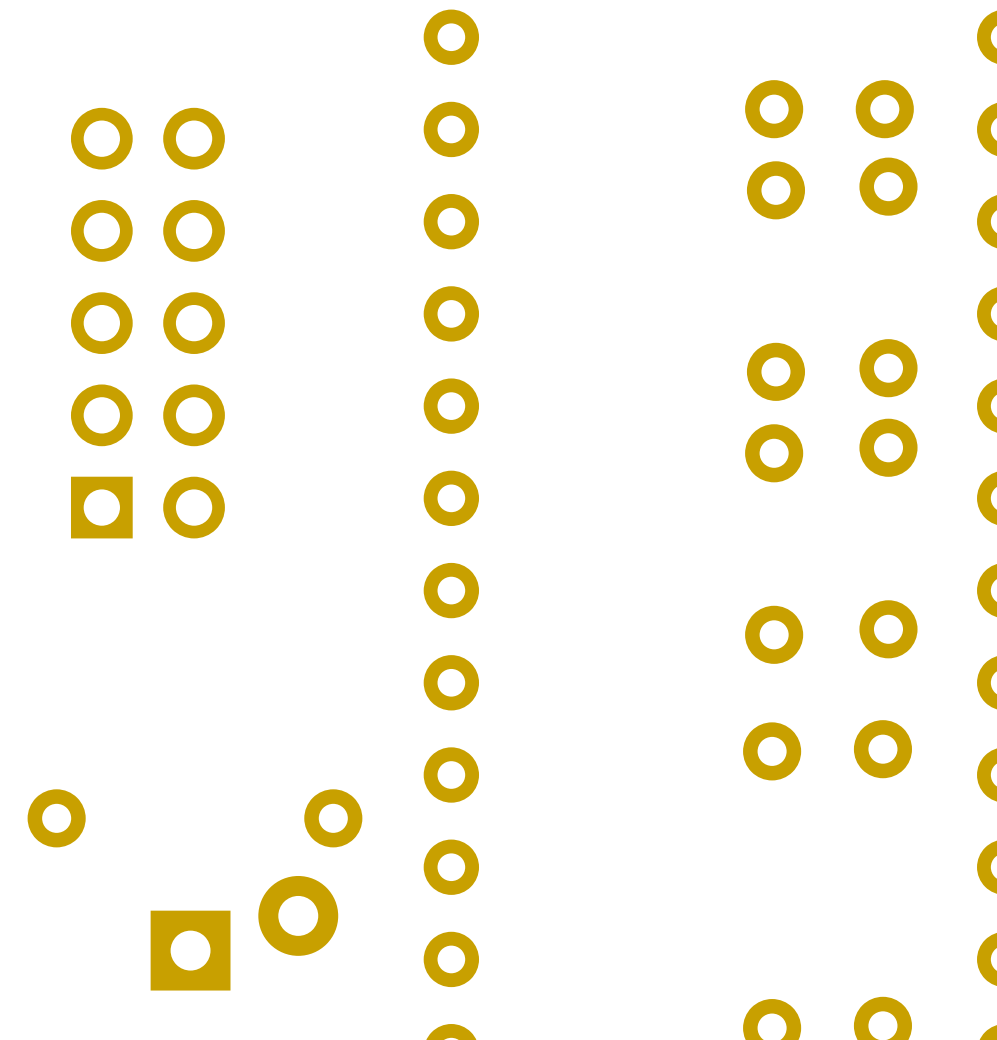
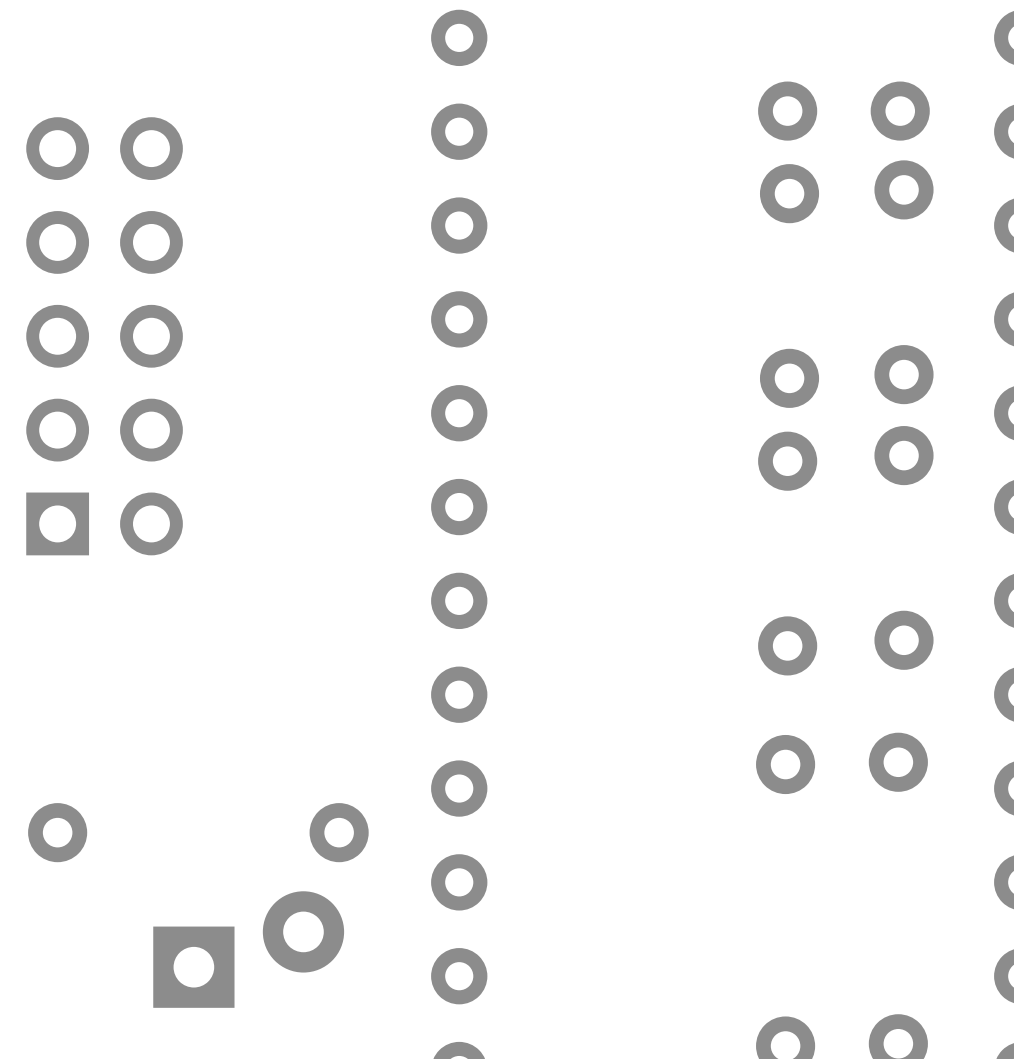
part position: (147, 323) -> (104, 336)

